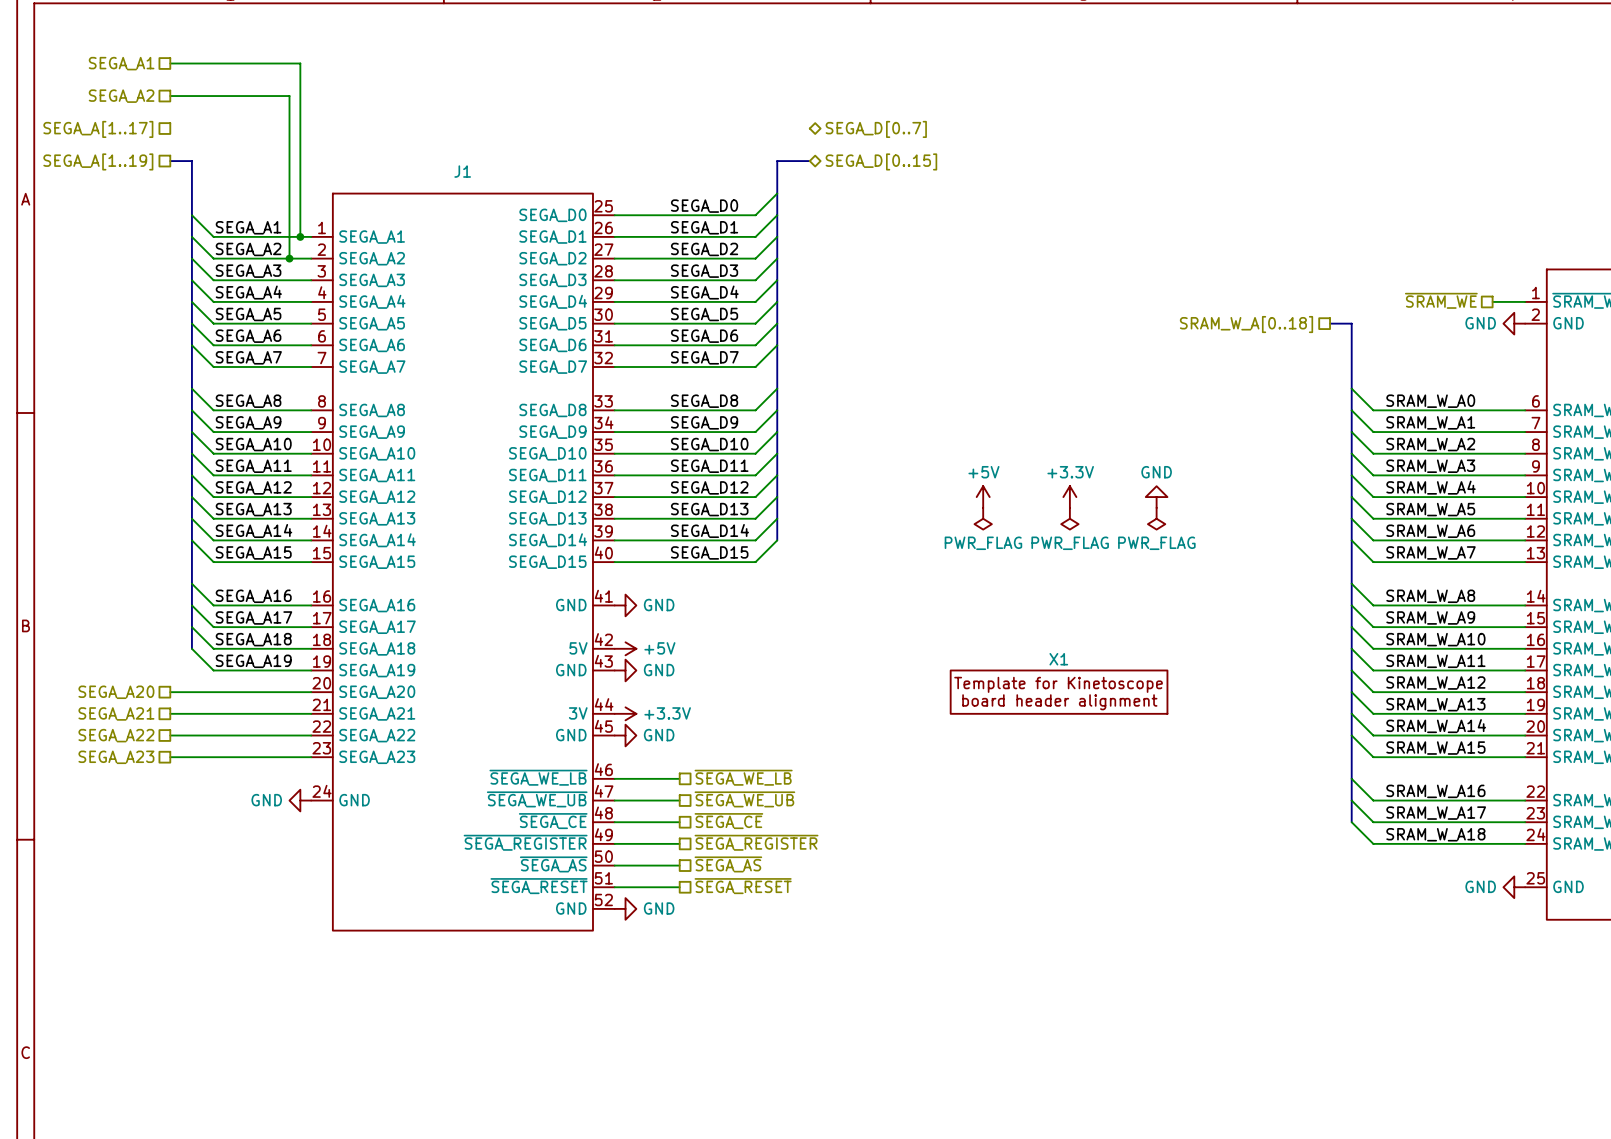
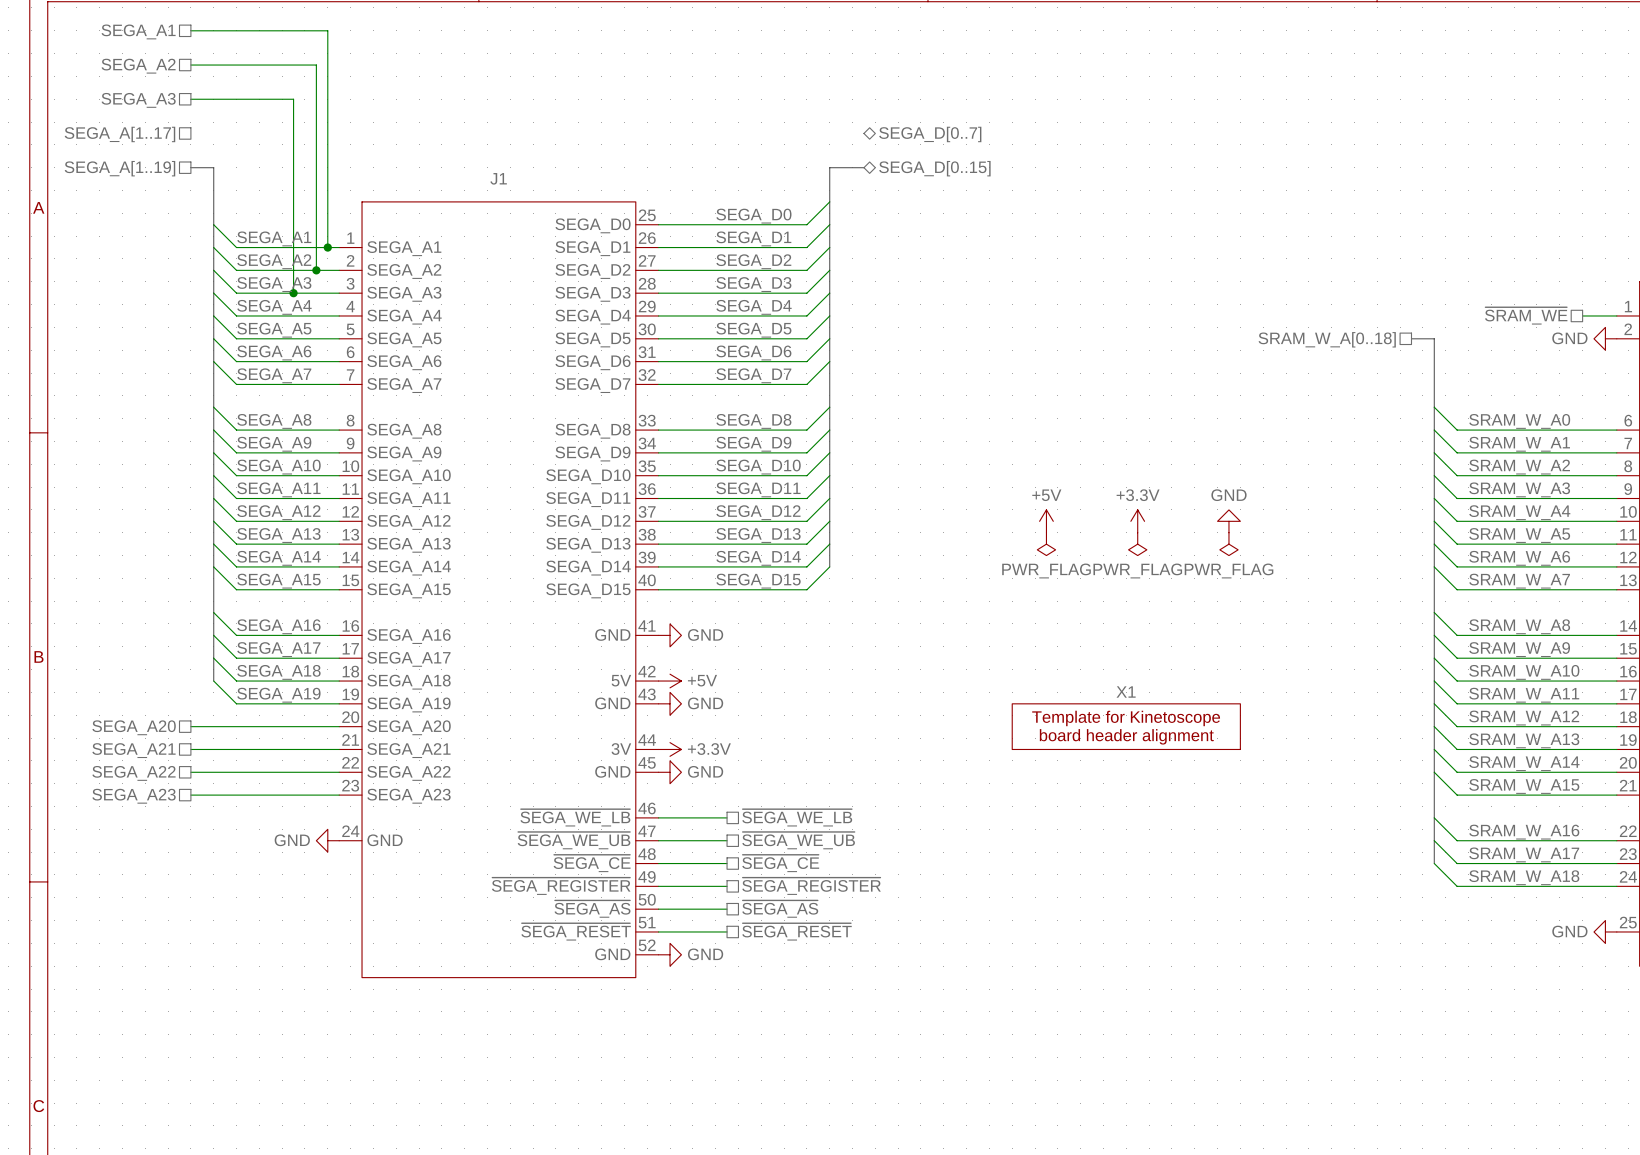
wire: none -> (190, 30) (327, 30) (327, 65)
hierarchical label: none -> SEGA_A1 (138, 31)
hierarchical label: SEGA_A1 (121, 63) -> SEGA_A2 (138, 66)
wire: (289, 63) (300, 63) -> (316, 65) (316, 99)
hierarchical label: SEGA_A2 (121, 96) -> SEGA_A3 (138, 100)
wire: (267, 96) (289, 96) -> (293, 99) (293, 293)
junction: none -> (293, 293)

